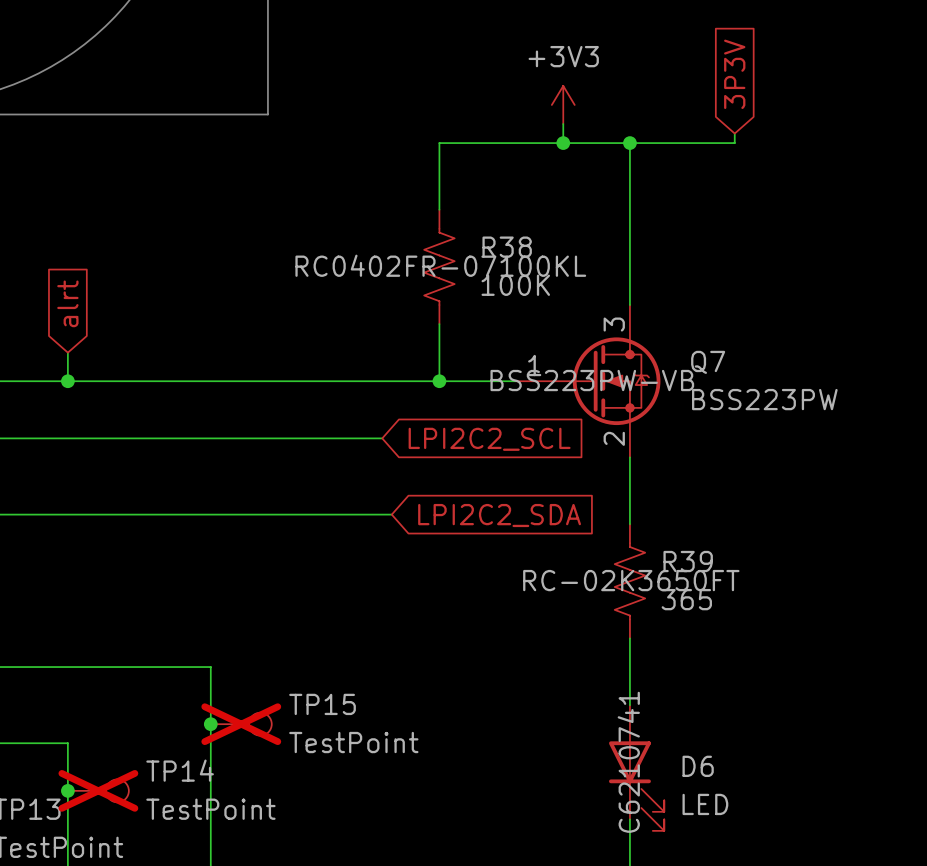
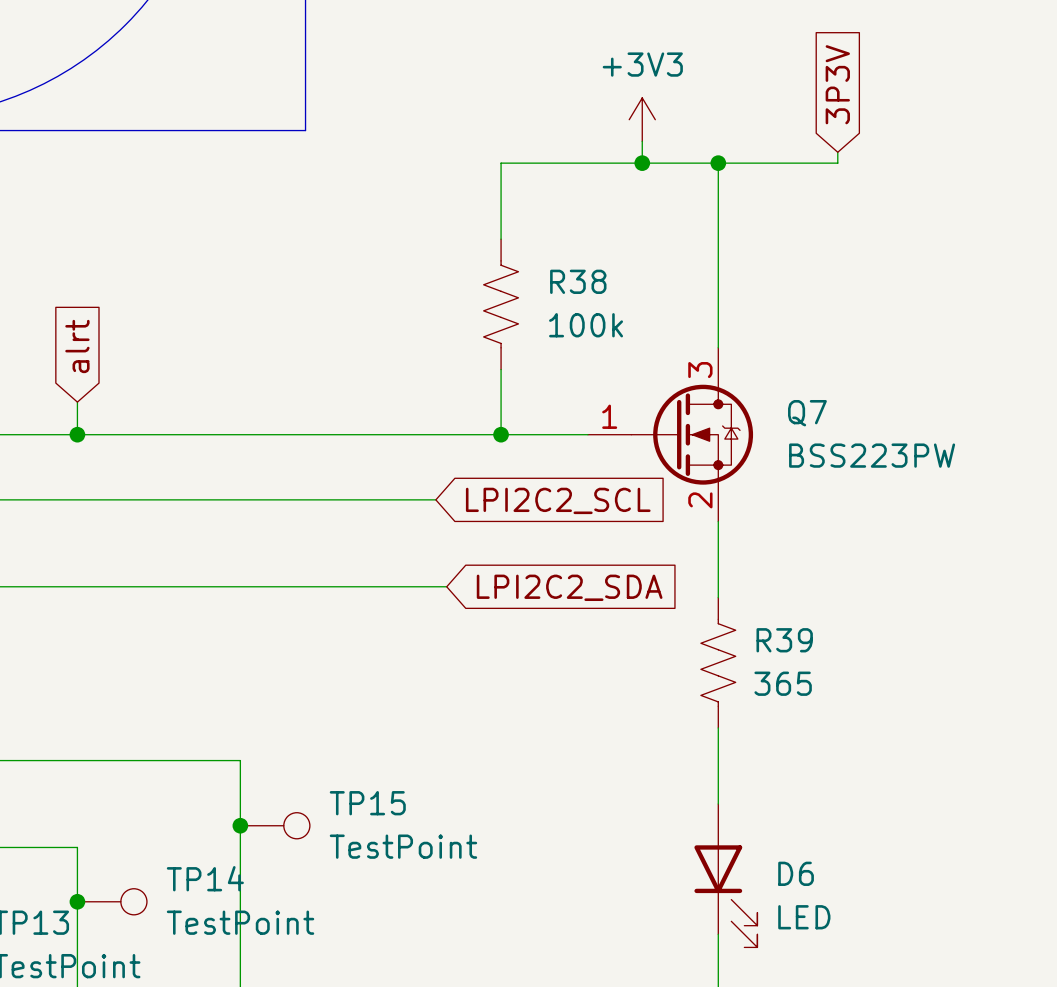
R38 text: RC0402FR-07100KL (440, 265) -> none
R38 value: 100K (515, 285) -> 100k (586, 325)
Q7 text: BSS223PW-VB (592, 380) -> none
R39 text: RC-02K3650FT (631, 580) -> none
TP15 do-not-place cross: (241, 724) -> none
D6 text: C6210741 (628, 762) -> none
TP14 do-not-place cross: (98, 790) -> none

